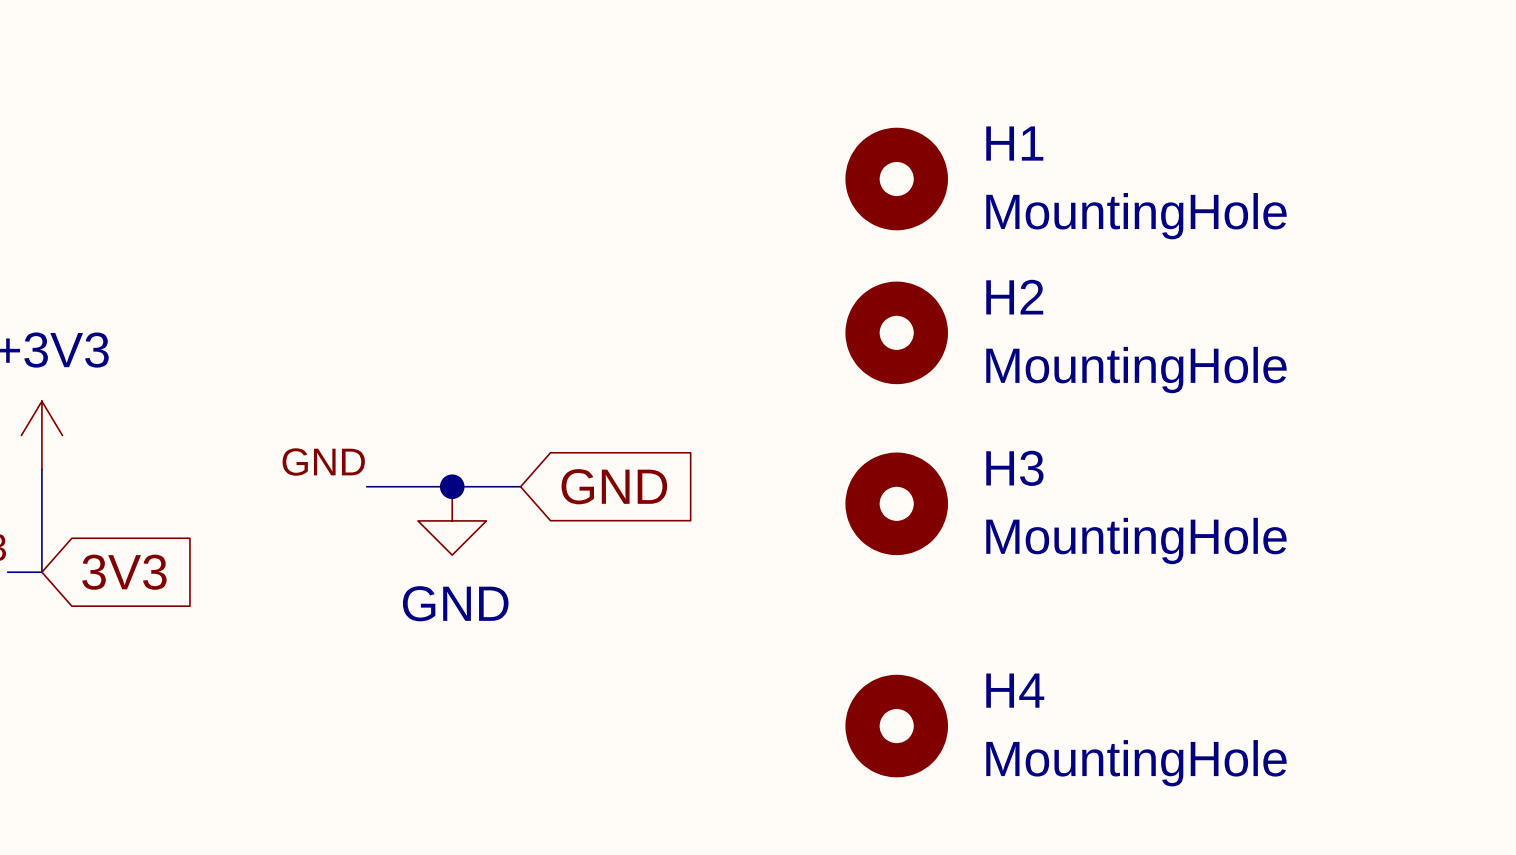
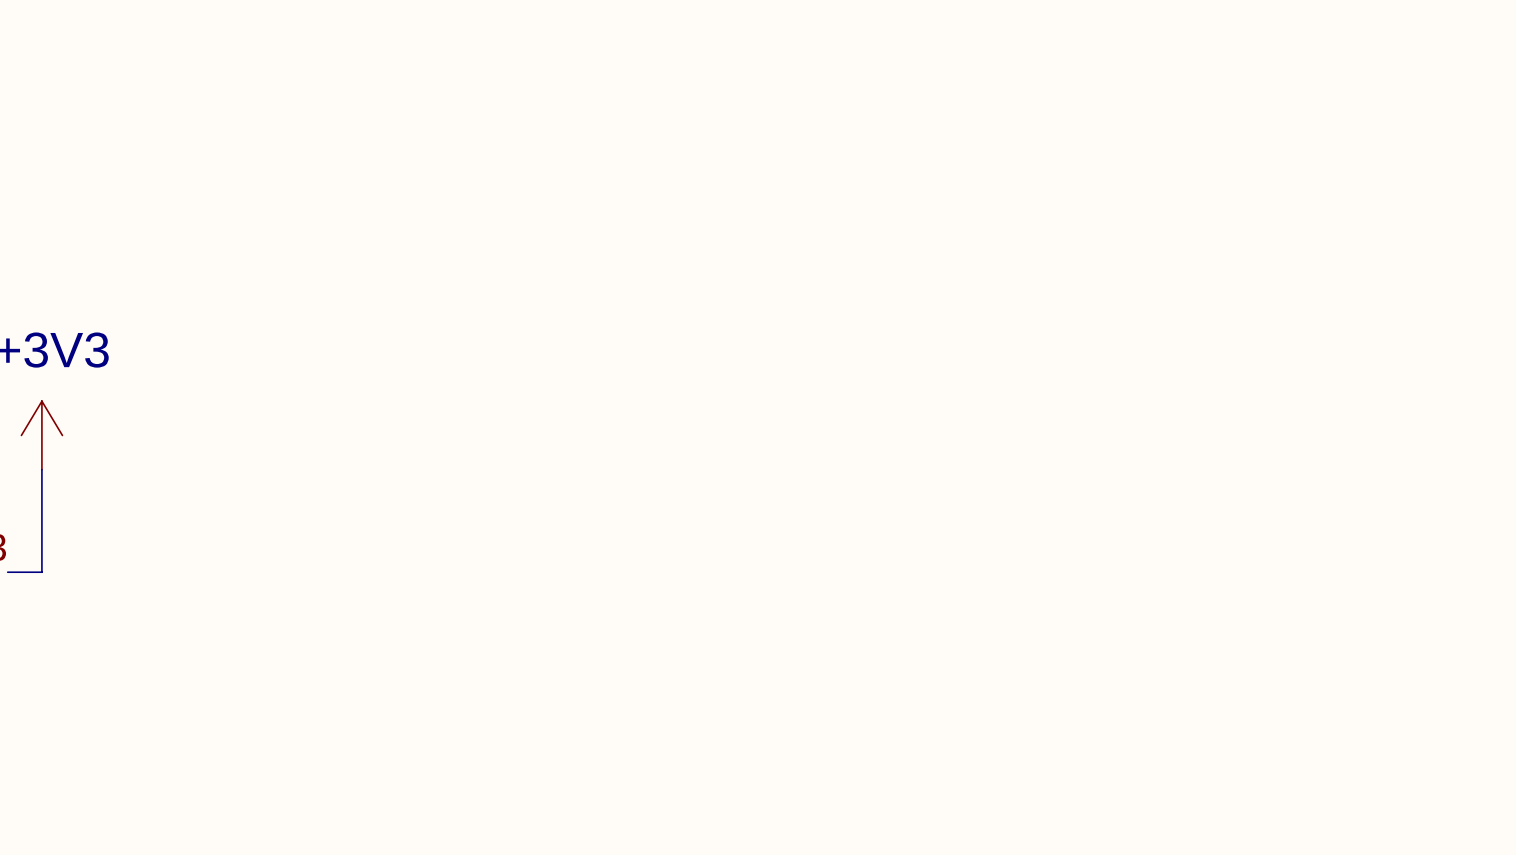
H1: MountingHole (896, 179) -> none
H2: MountingHole (896, 332) -> none
label: GND (323, 462) -> none
wire: (366, 486) (520, 486) -> none
junction: (452, 486) -> none
global label: GND (614, 486) -> none
H3: MountingHole (896, 503) -> none
power symbol: GND (452, 520) -> none
global label: 3V3 (124, 572) -> none
H4: MountingHole (896, 726) -> none

